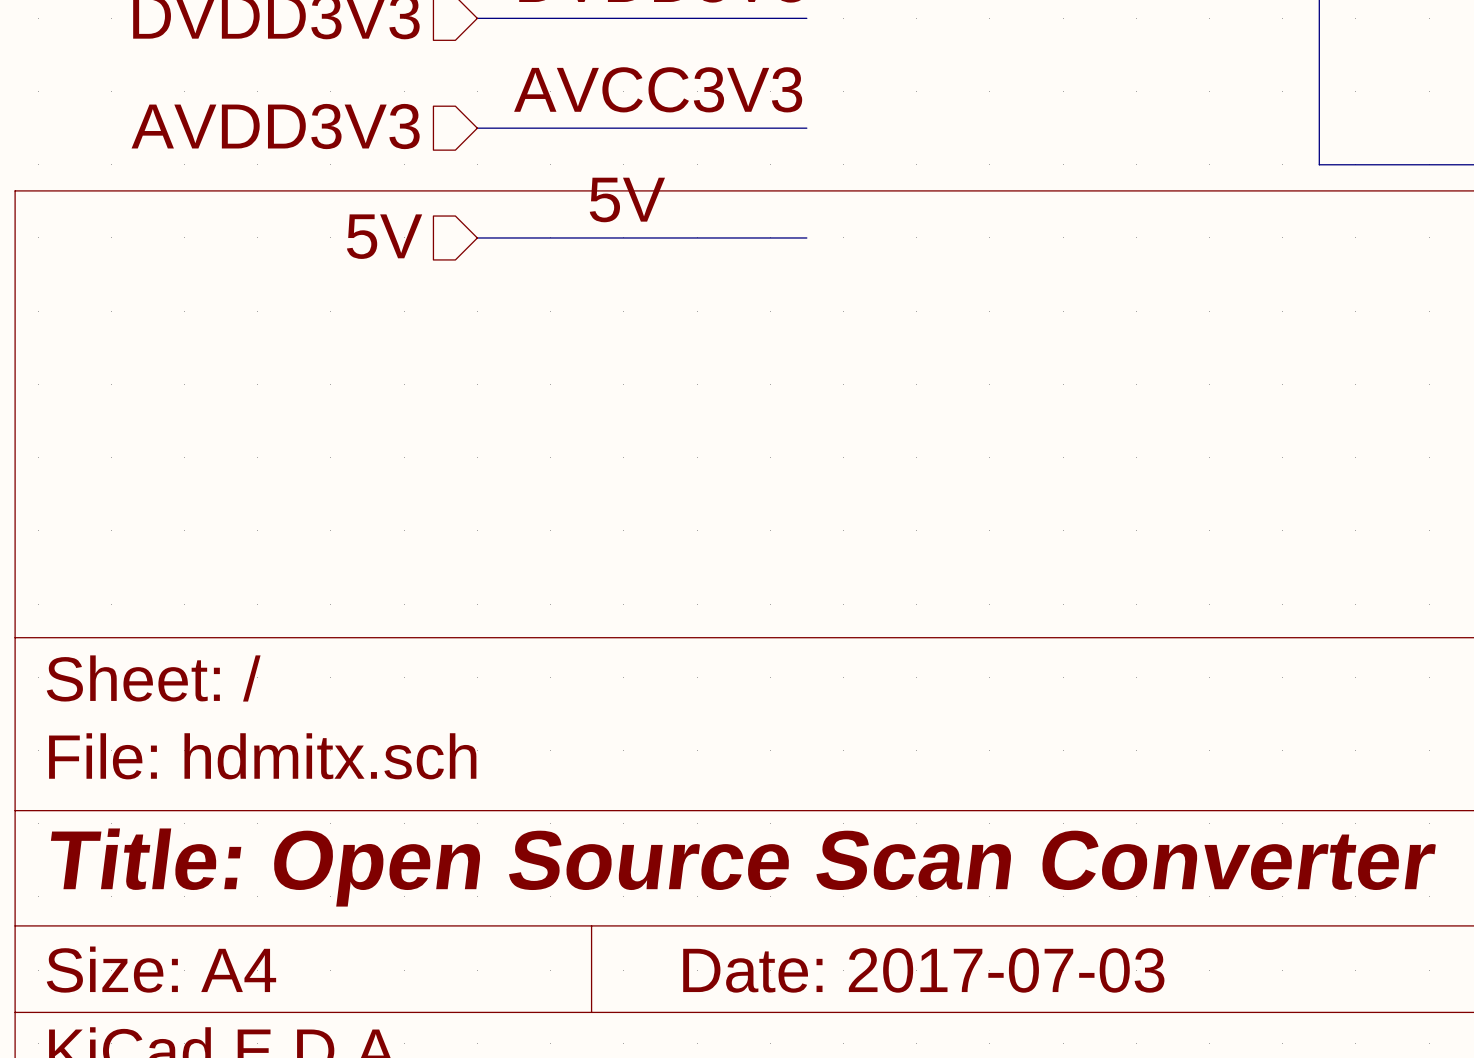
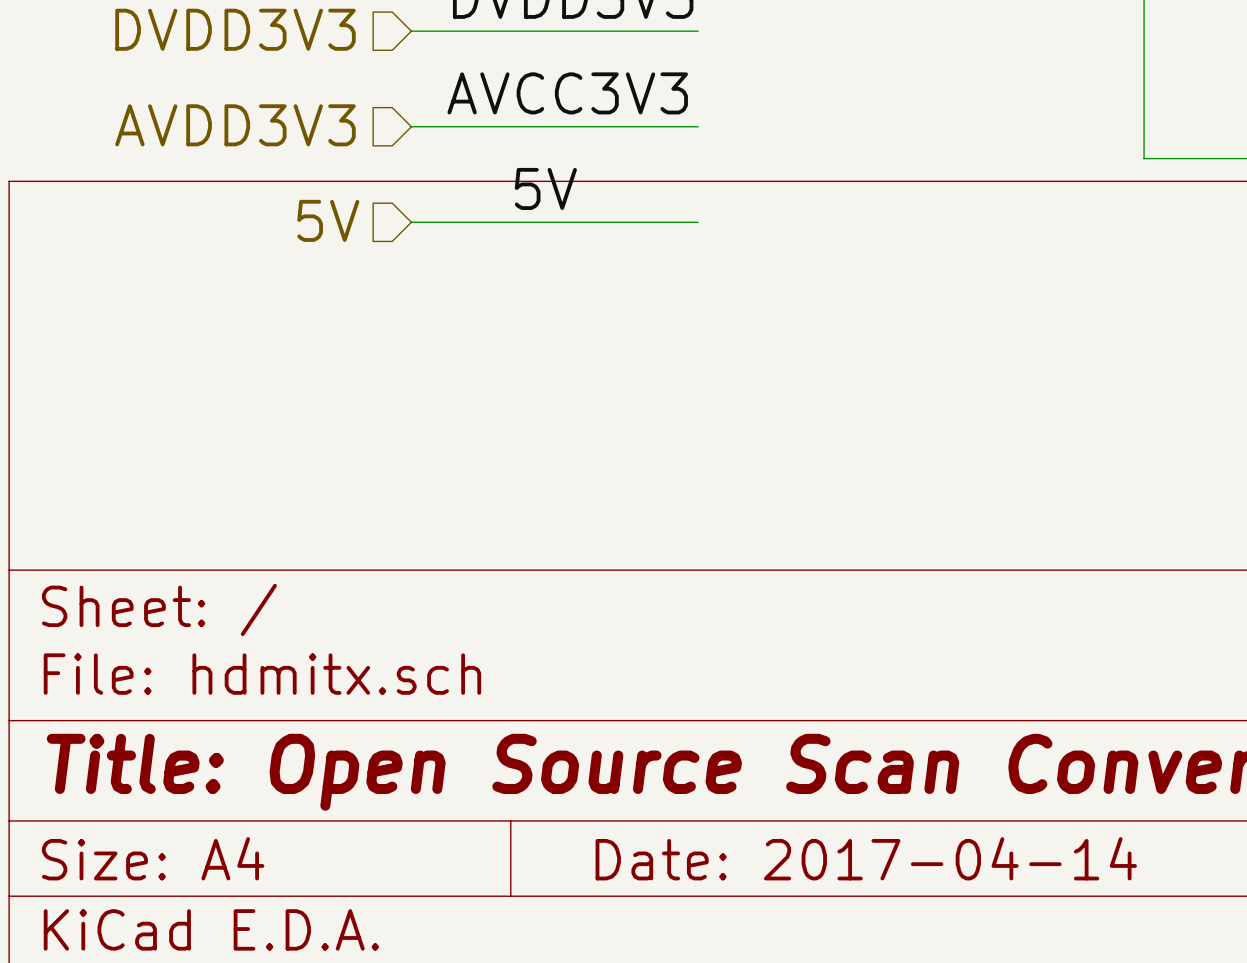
title block: Date: 2017-07-03 (923, 970) -> Date: 2017-04-14 (866, 858)

